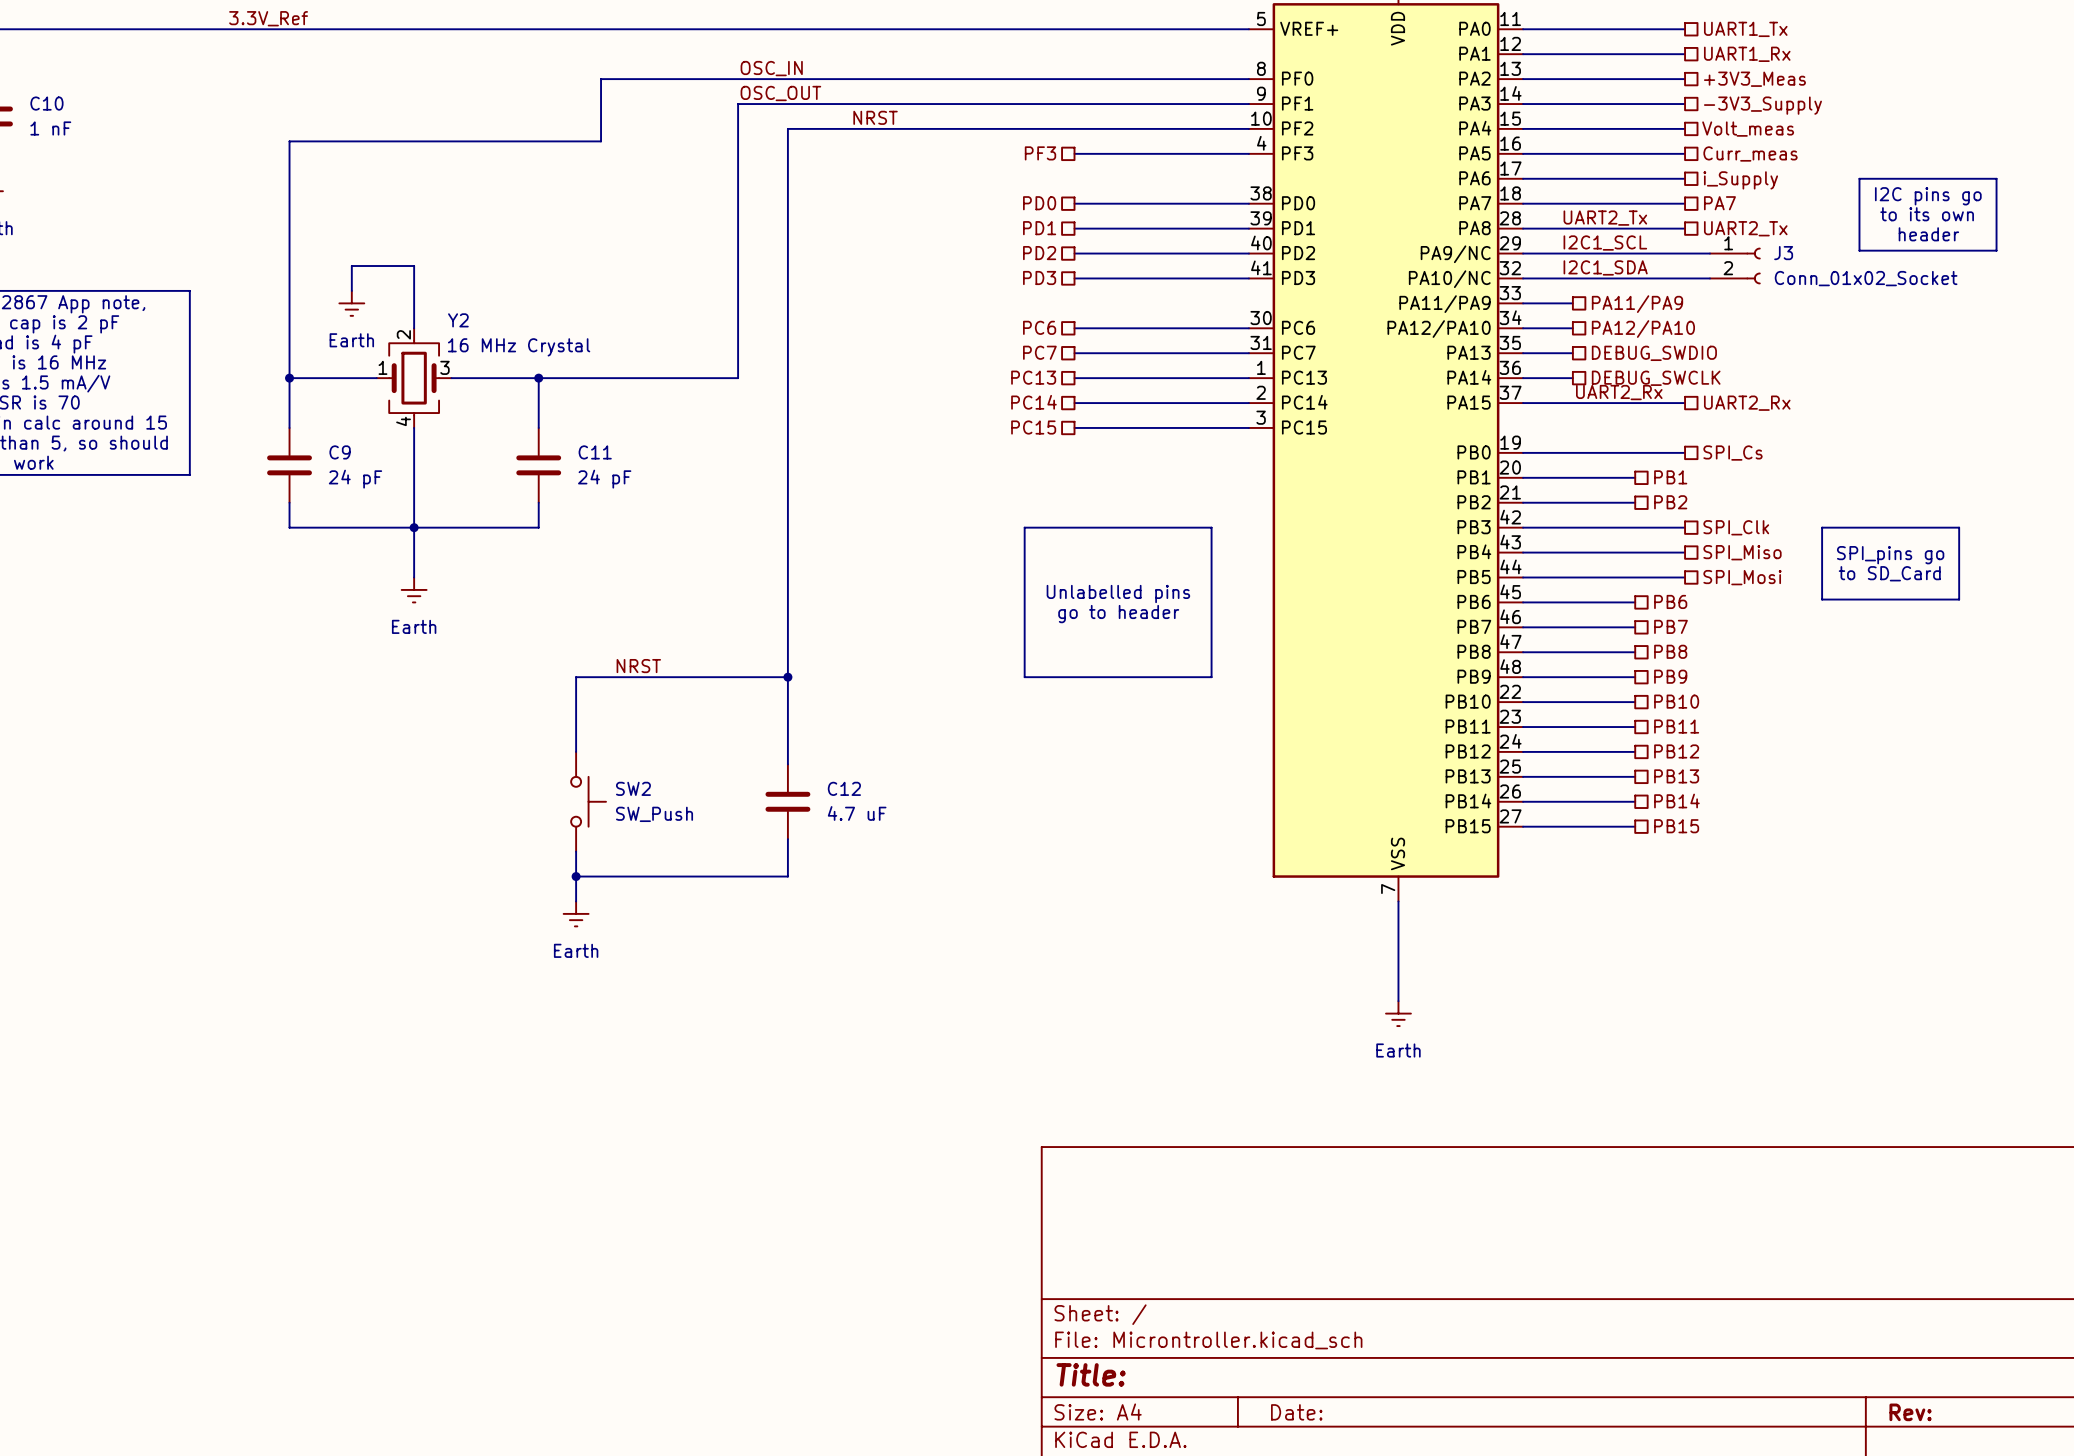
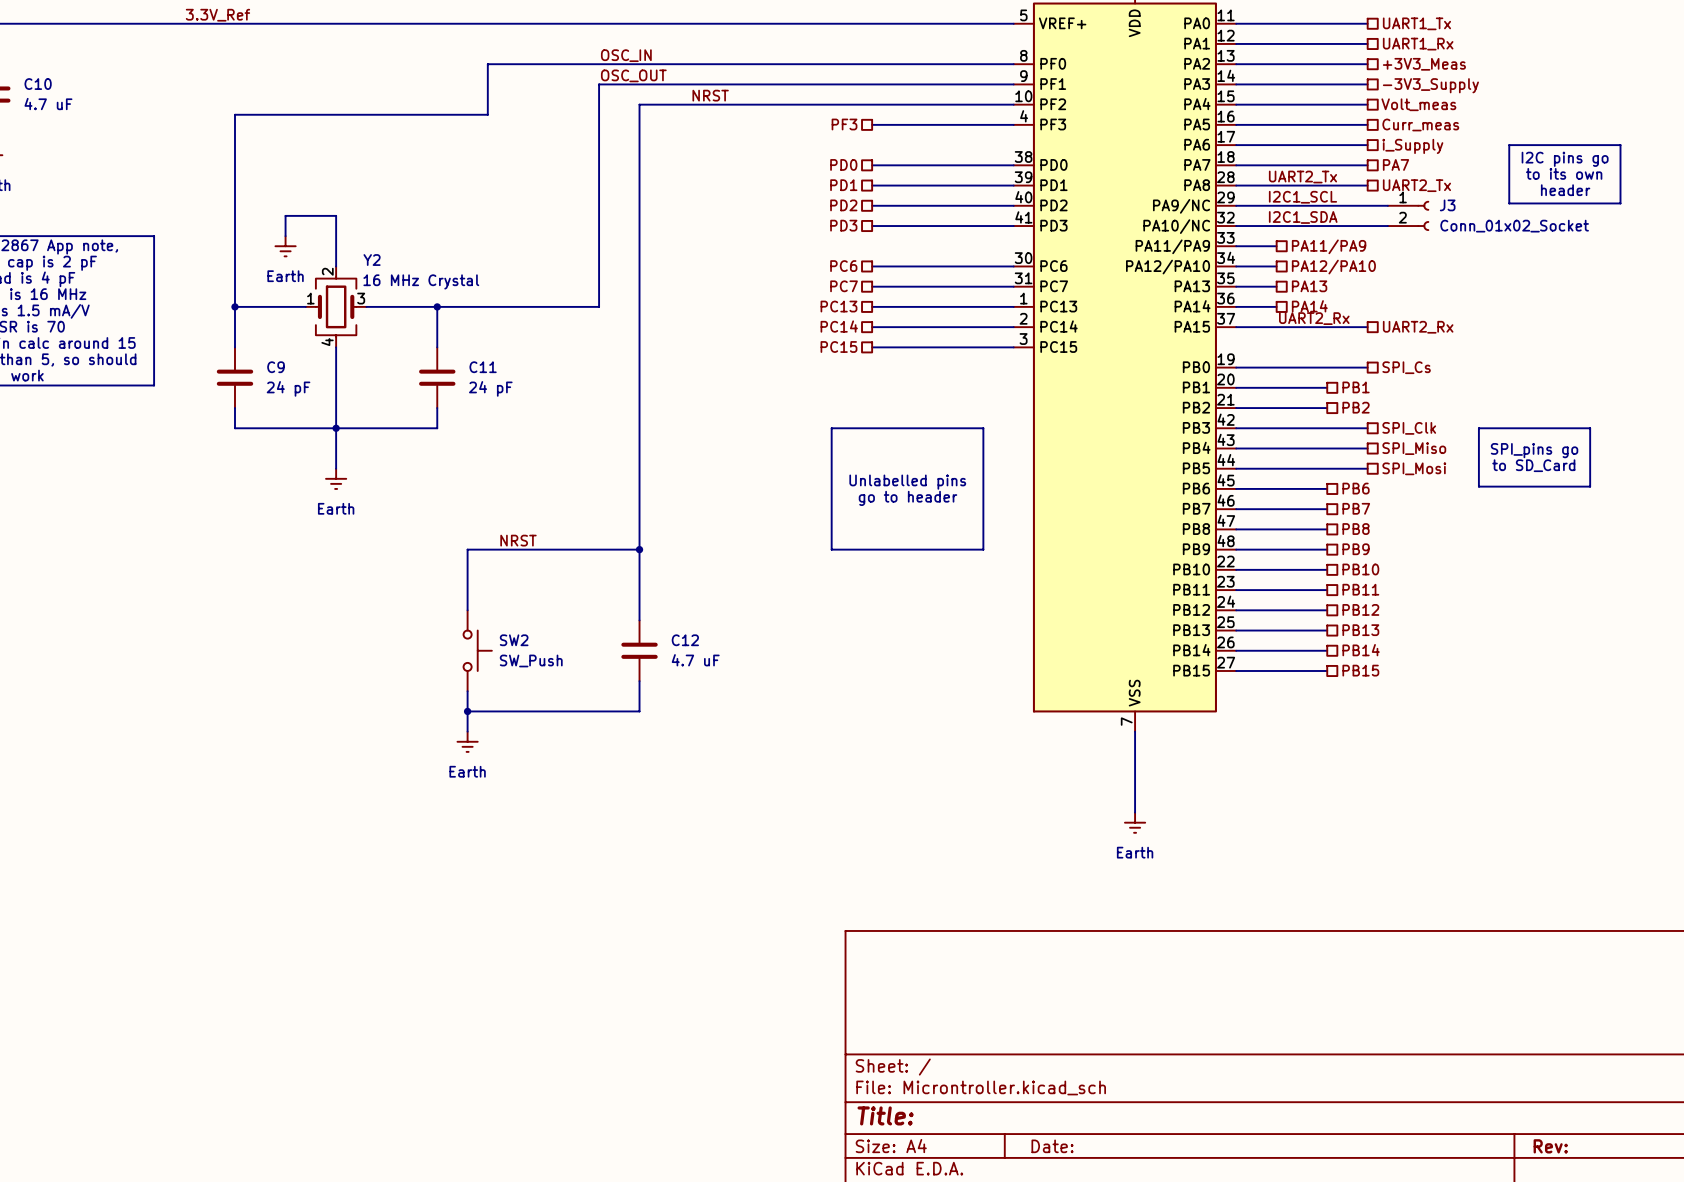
C10 value: 1 nF (50, 128) -> 4.7 uF (48, 104)
hierarchical label: DEBUG_SWDIO (1654, 353) -> PA13 (1309, 286)
hierarchical label: DEBUG_SWCLK (1656, 378) -> PA14 (1309, 306)

